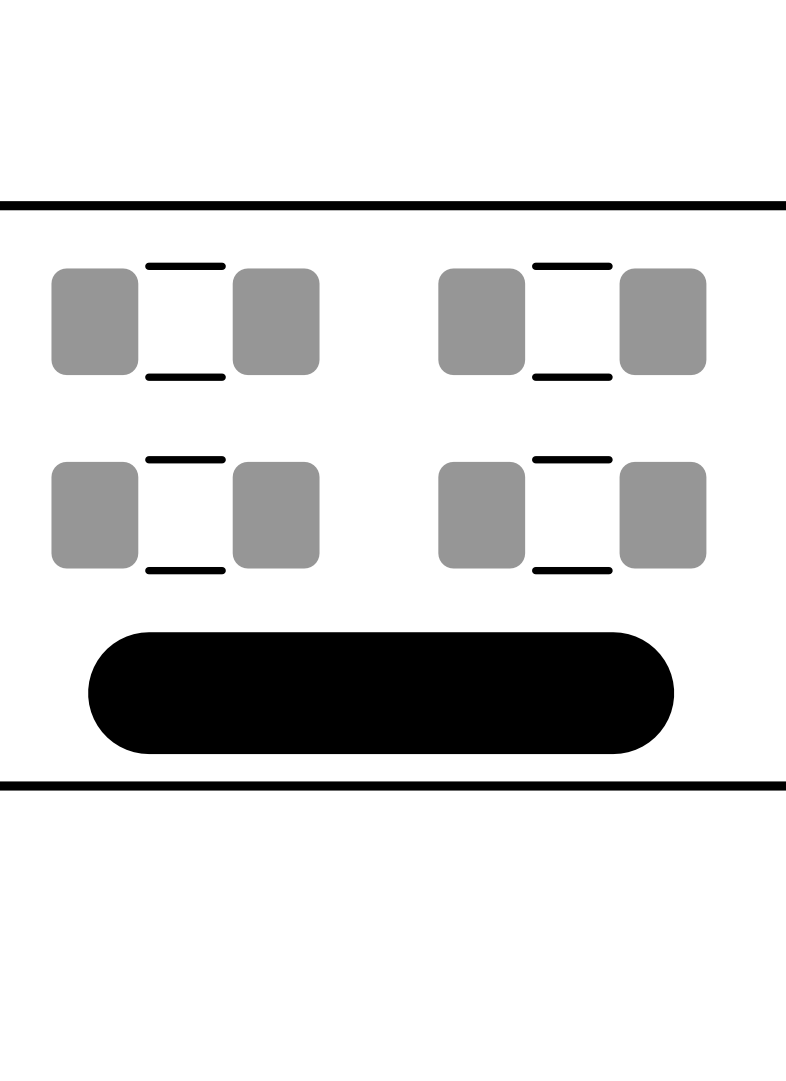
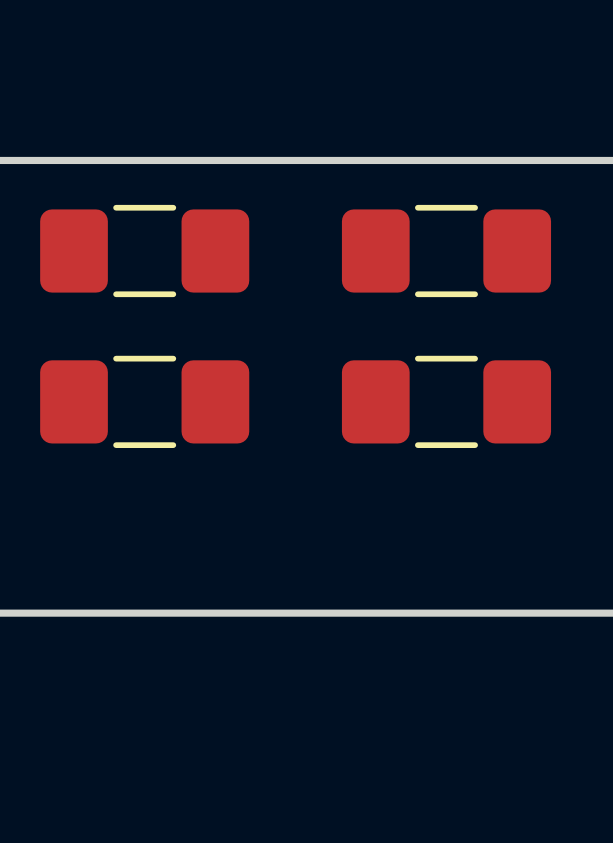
line: (149, 693) (613, 693) -> none

